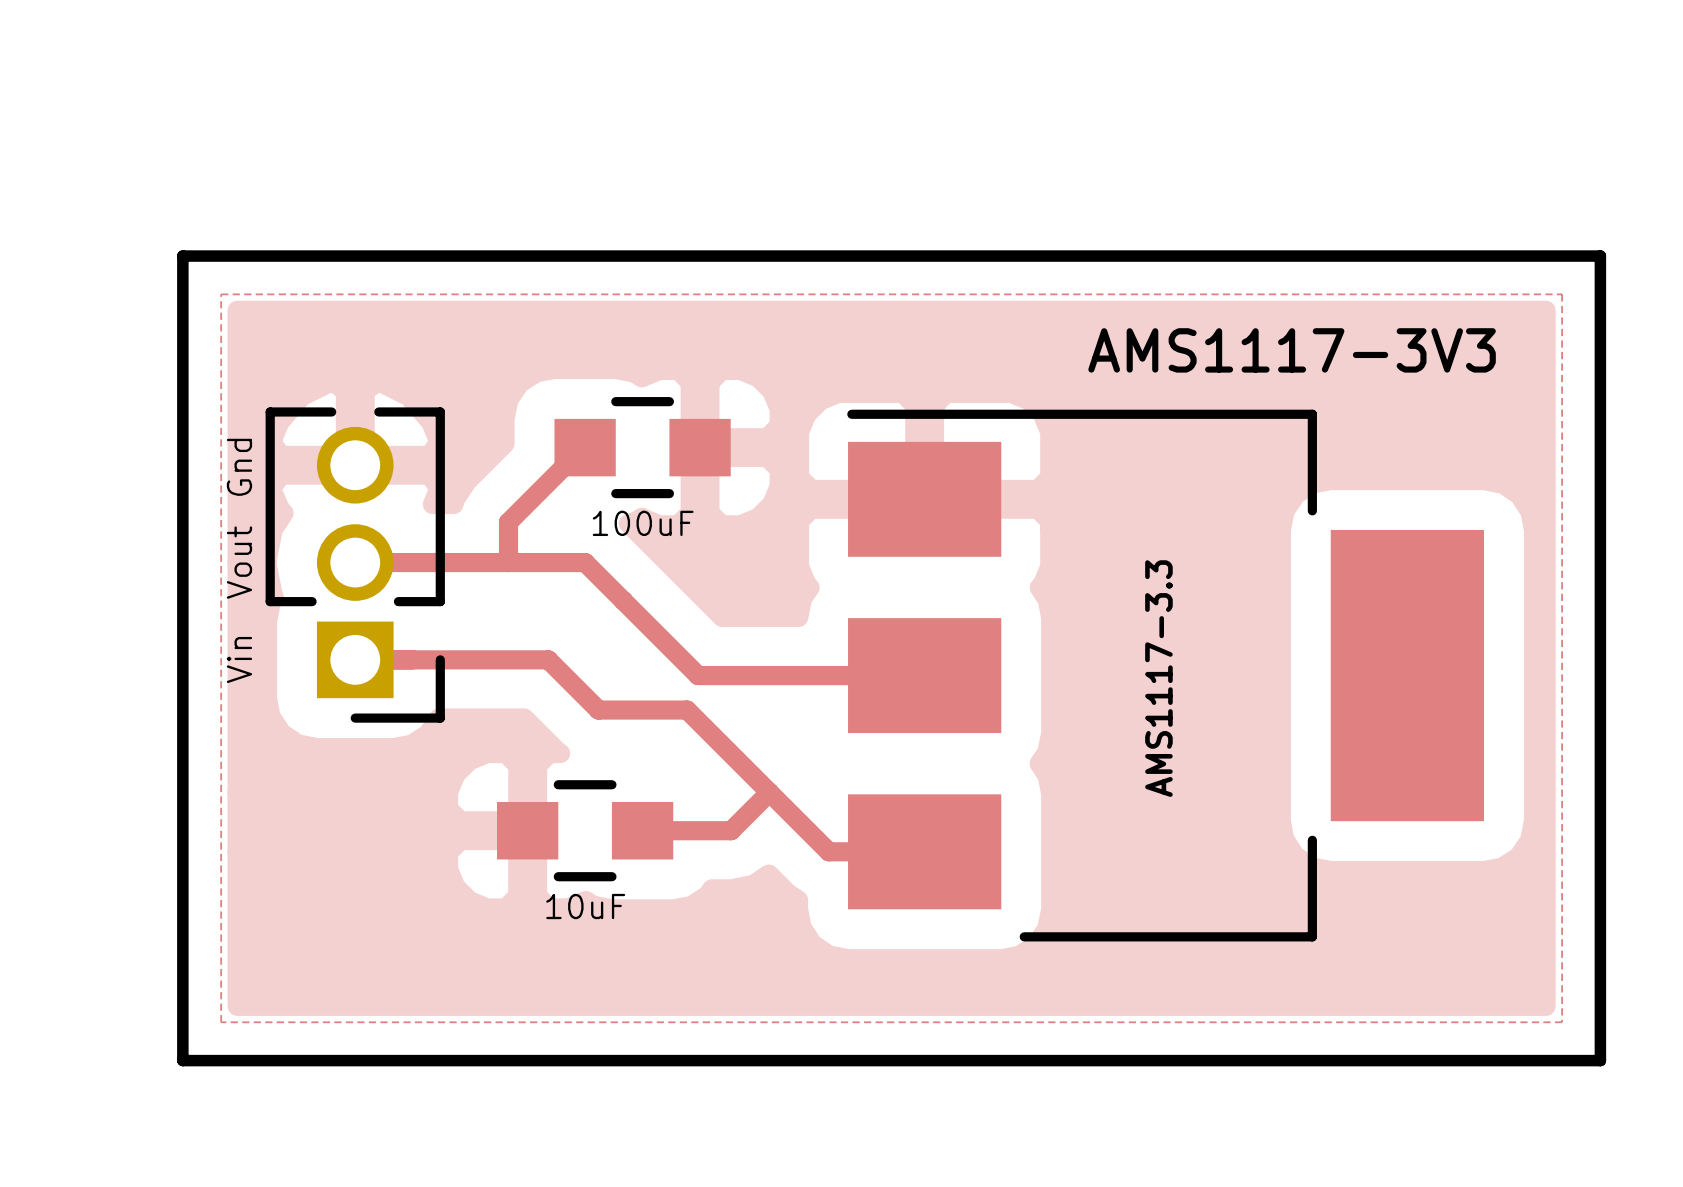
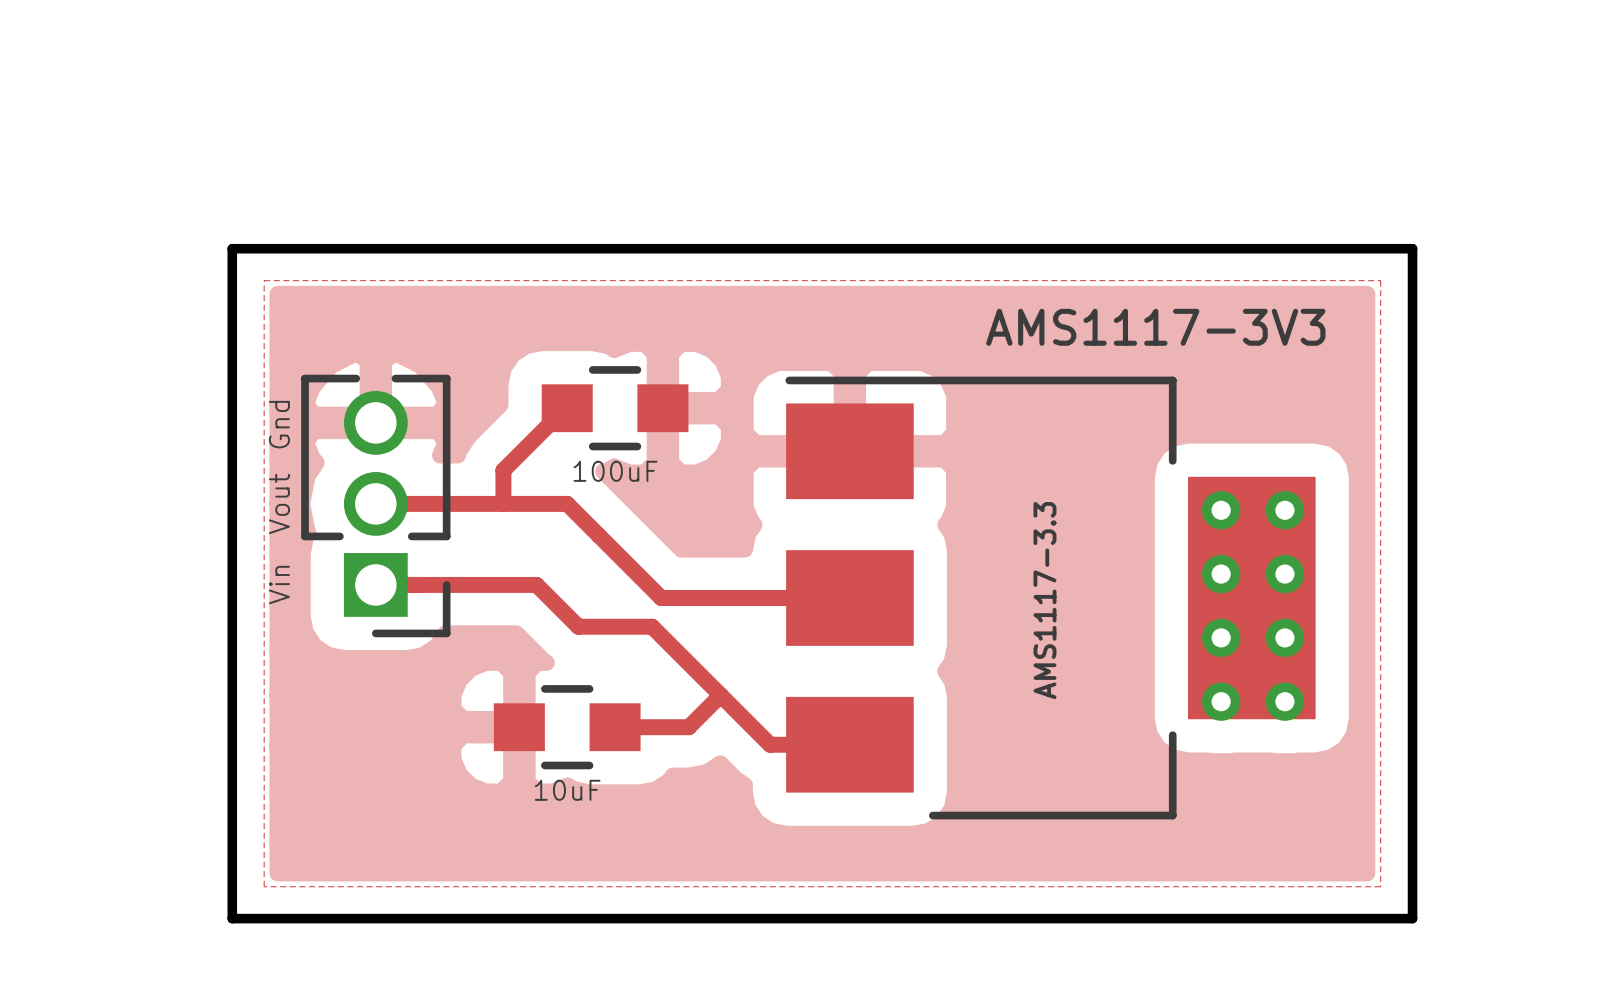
part: none -> (1221, 510)
part: none -> (1284, 510)
part: none -> (1221, 574)
part: none -> (1284, 574)
part: none -> (1221, 637)
part: none -> (1284, 637)
part: none -> (1221, 701)
part: none -> (1284, 701)

